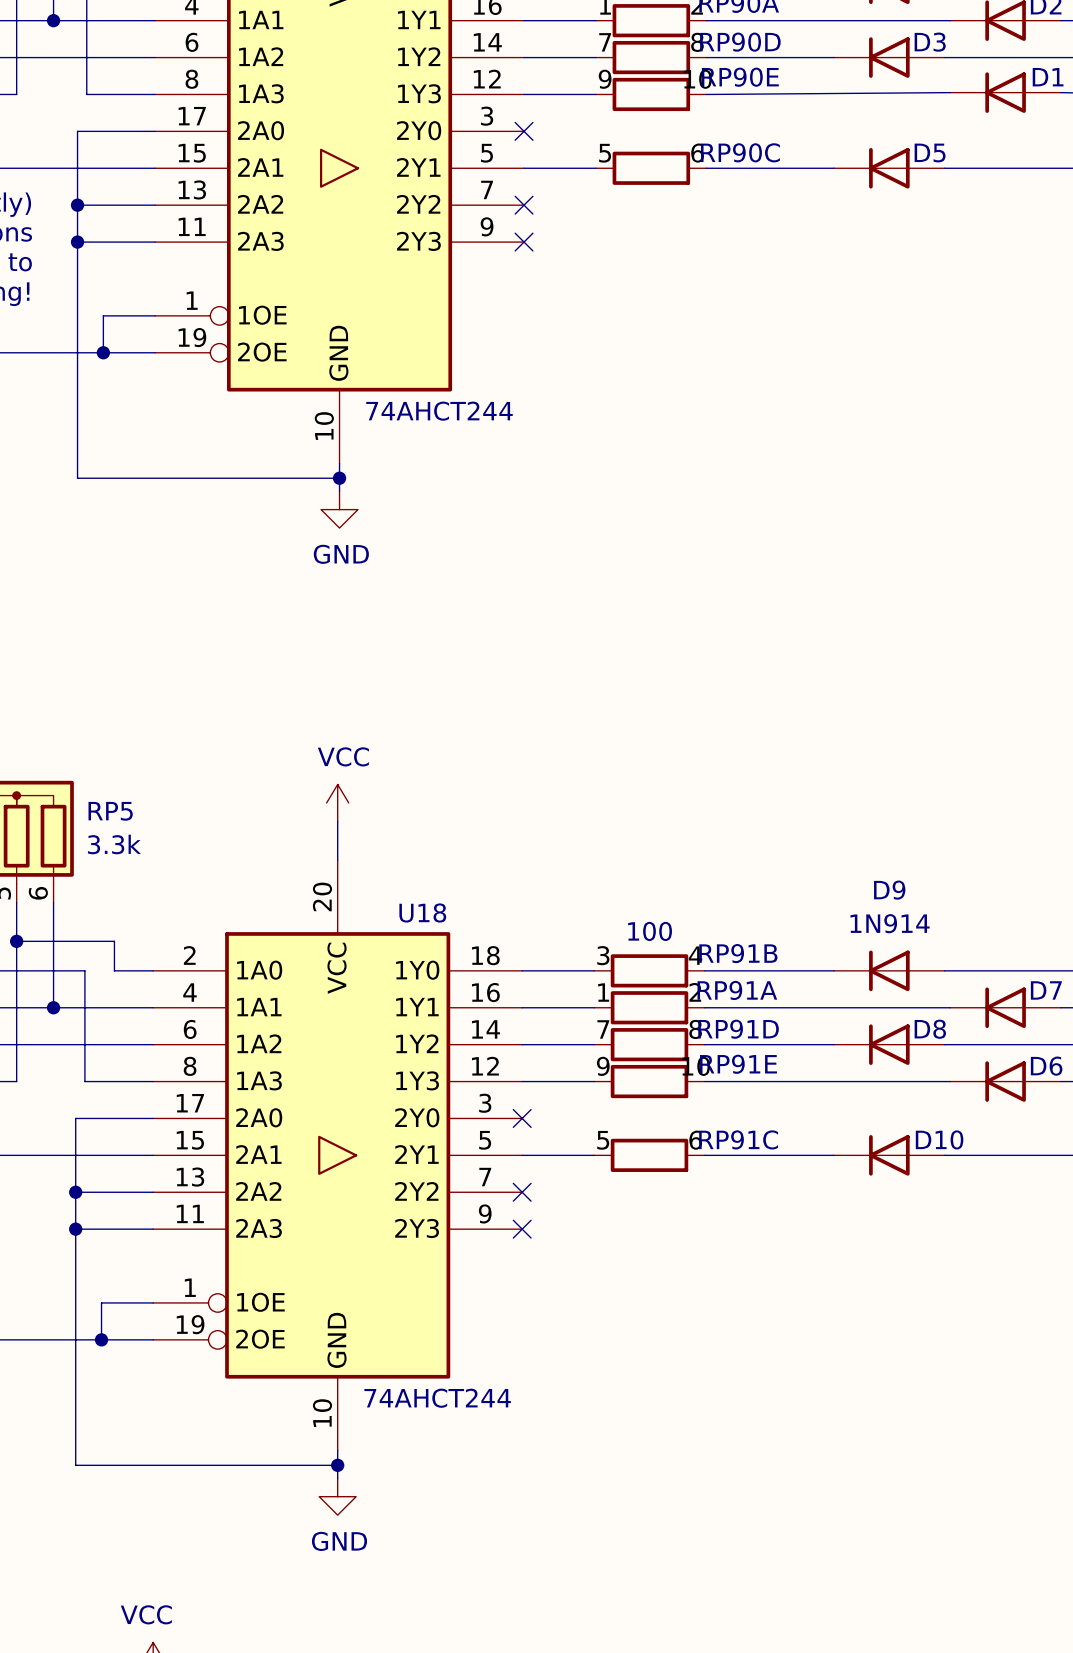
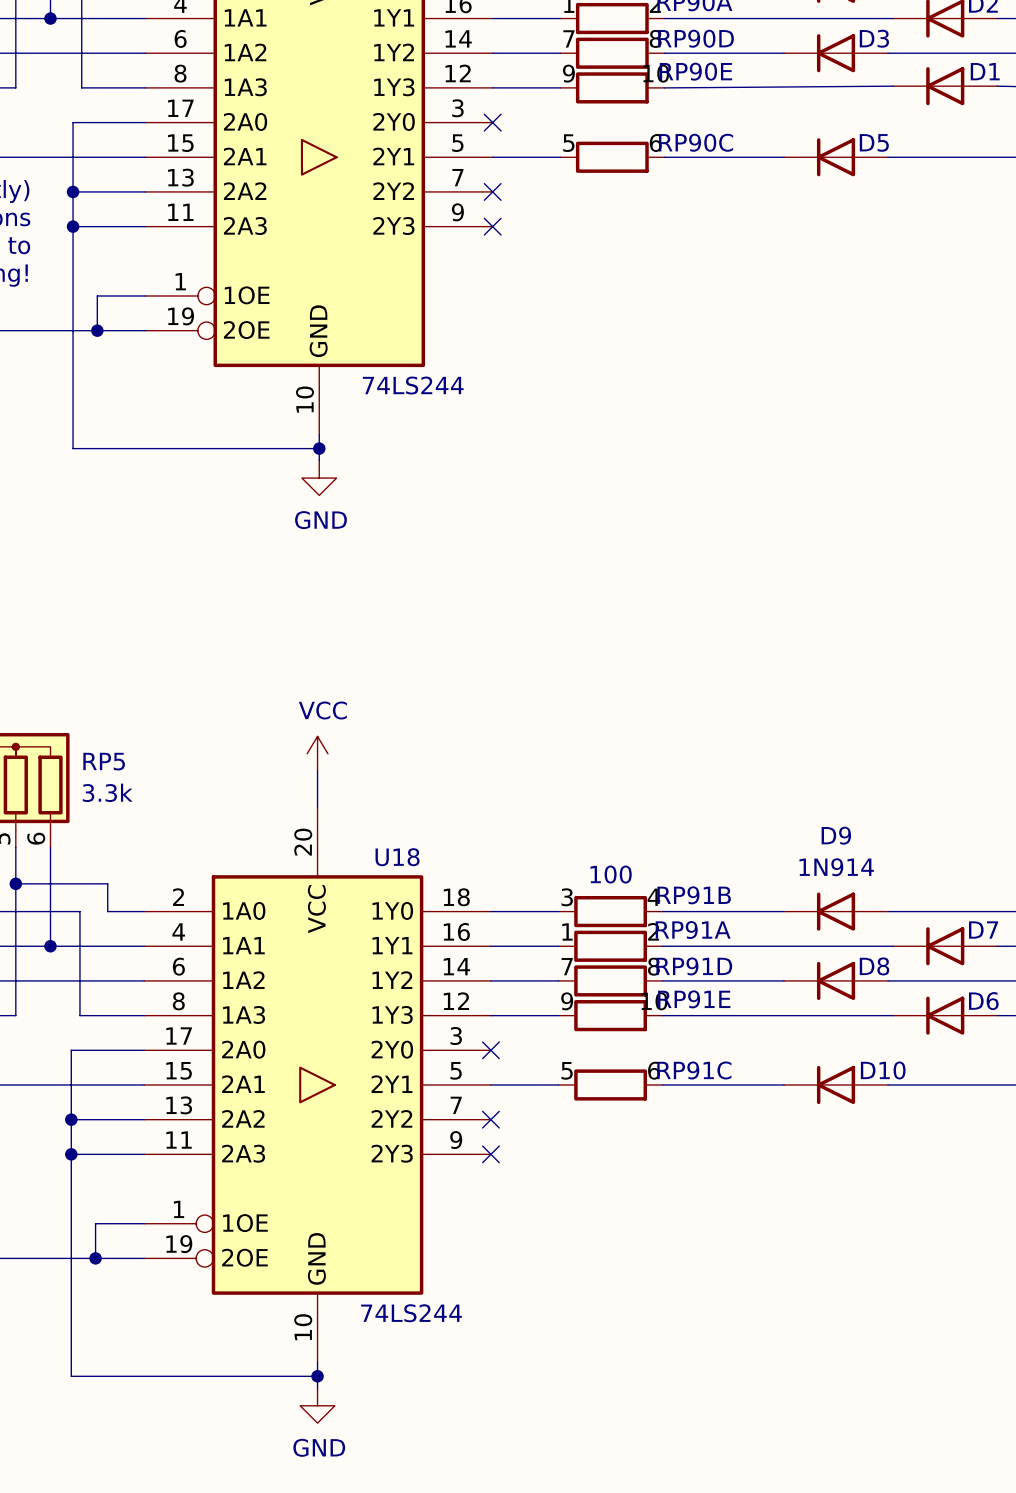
part value: 74AHCT244 (439, 411) -> 74LS244 (413, 385)
U18 value: 74AHCT244 (437, 1398) -> 74LS244 (411, 1313)

